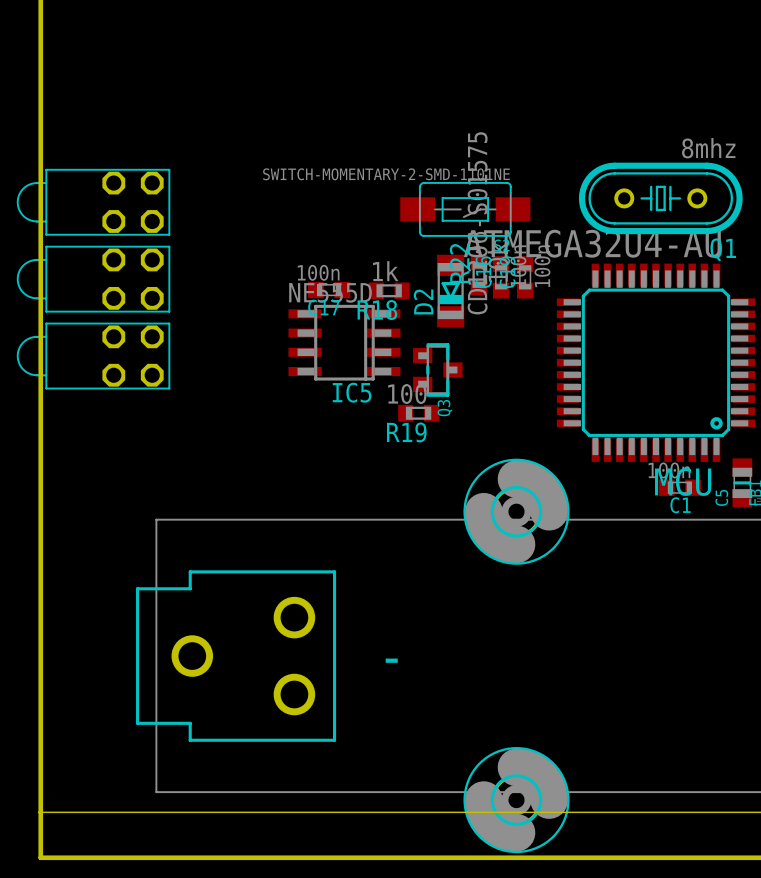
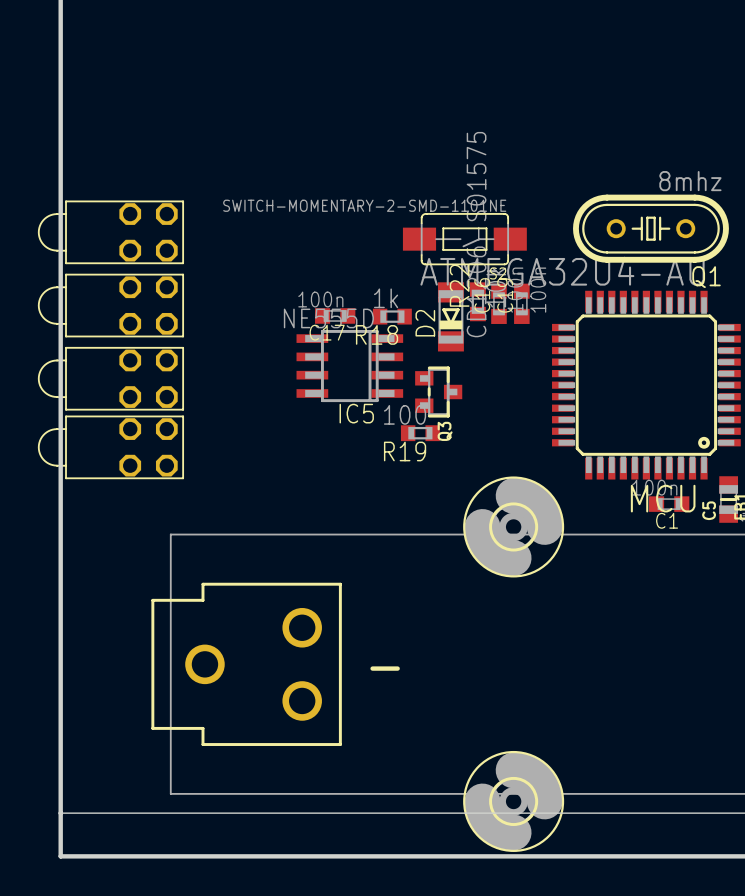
part: none -> (110, 447)

